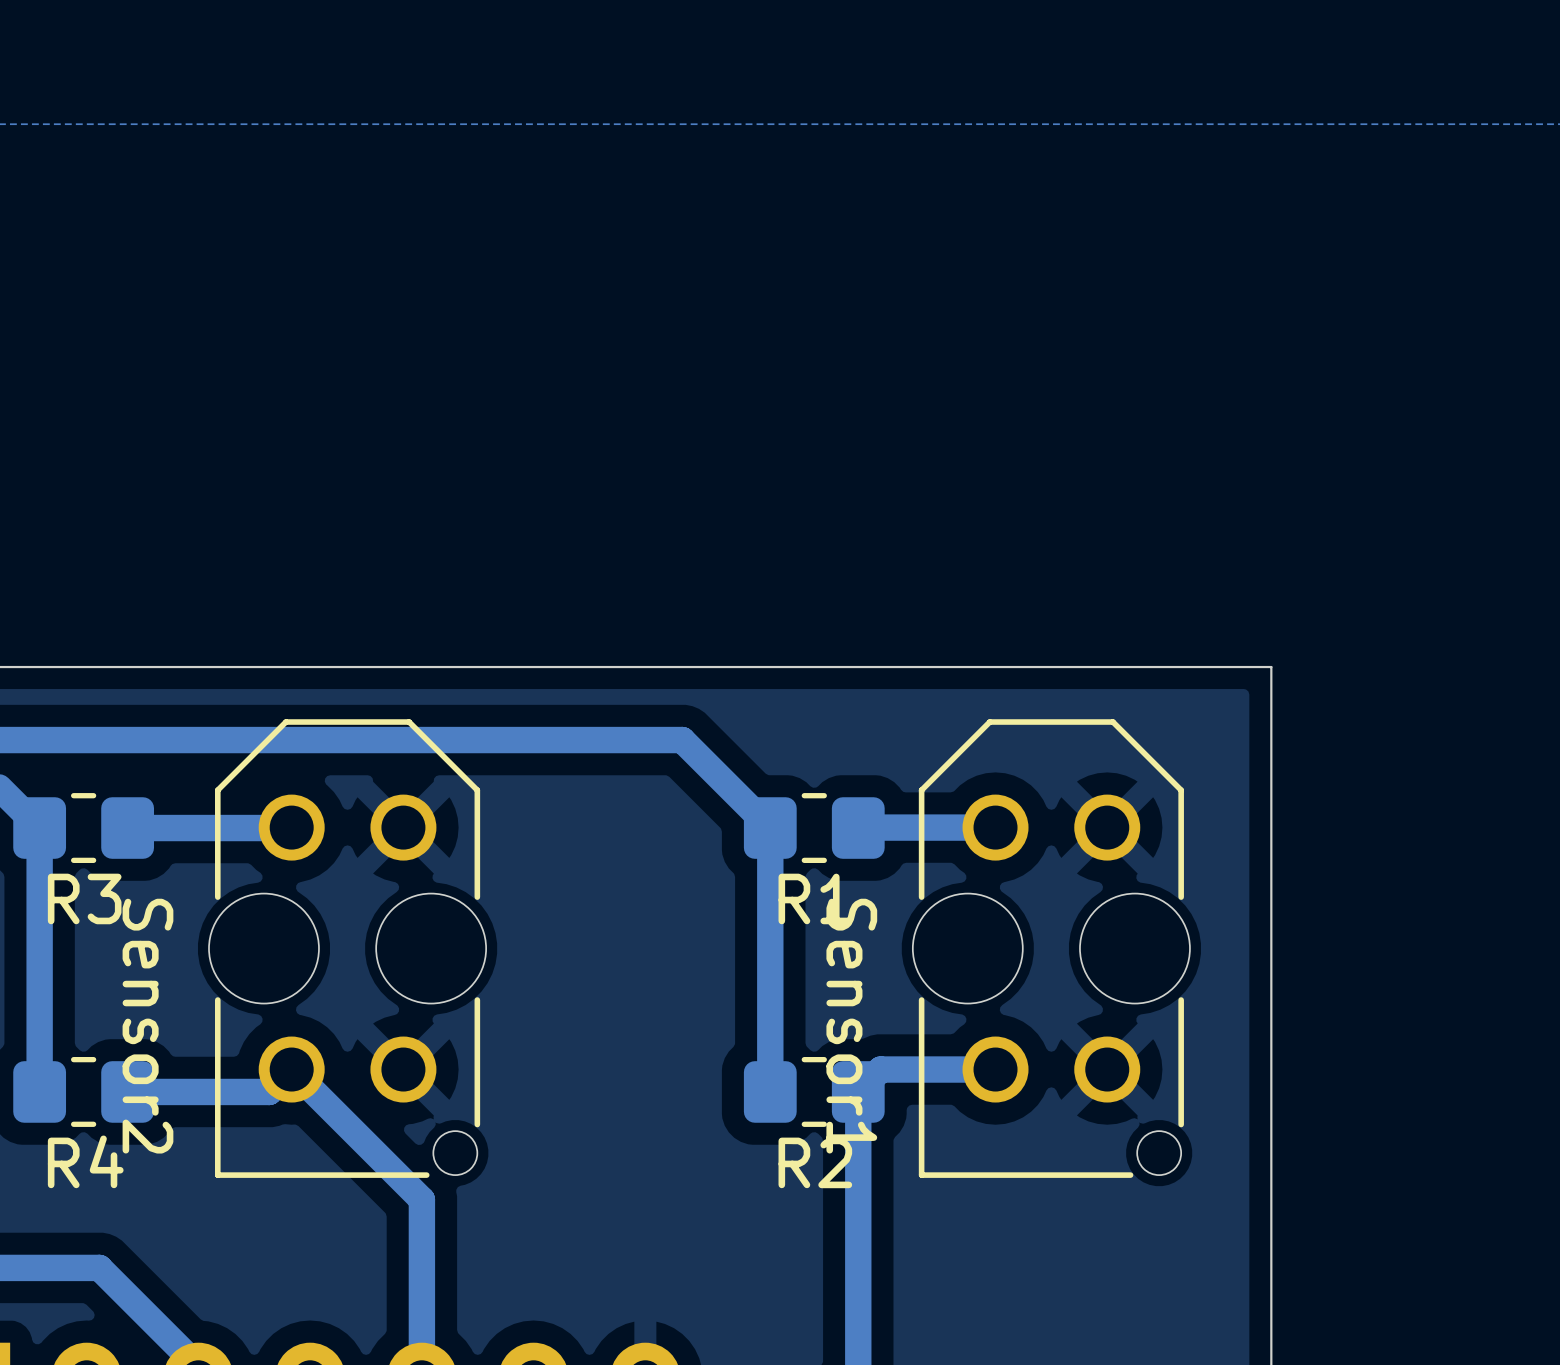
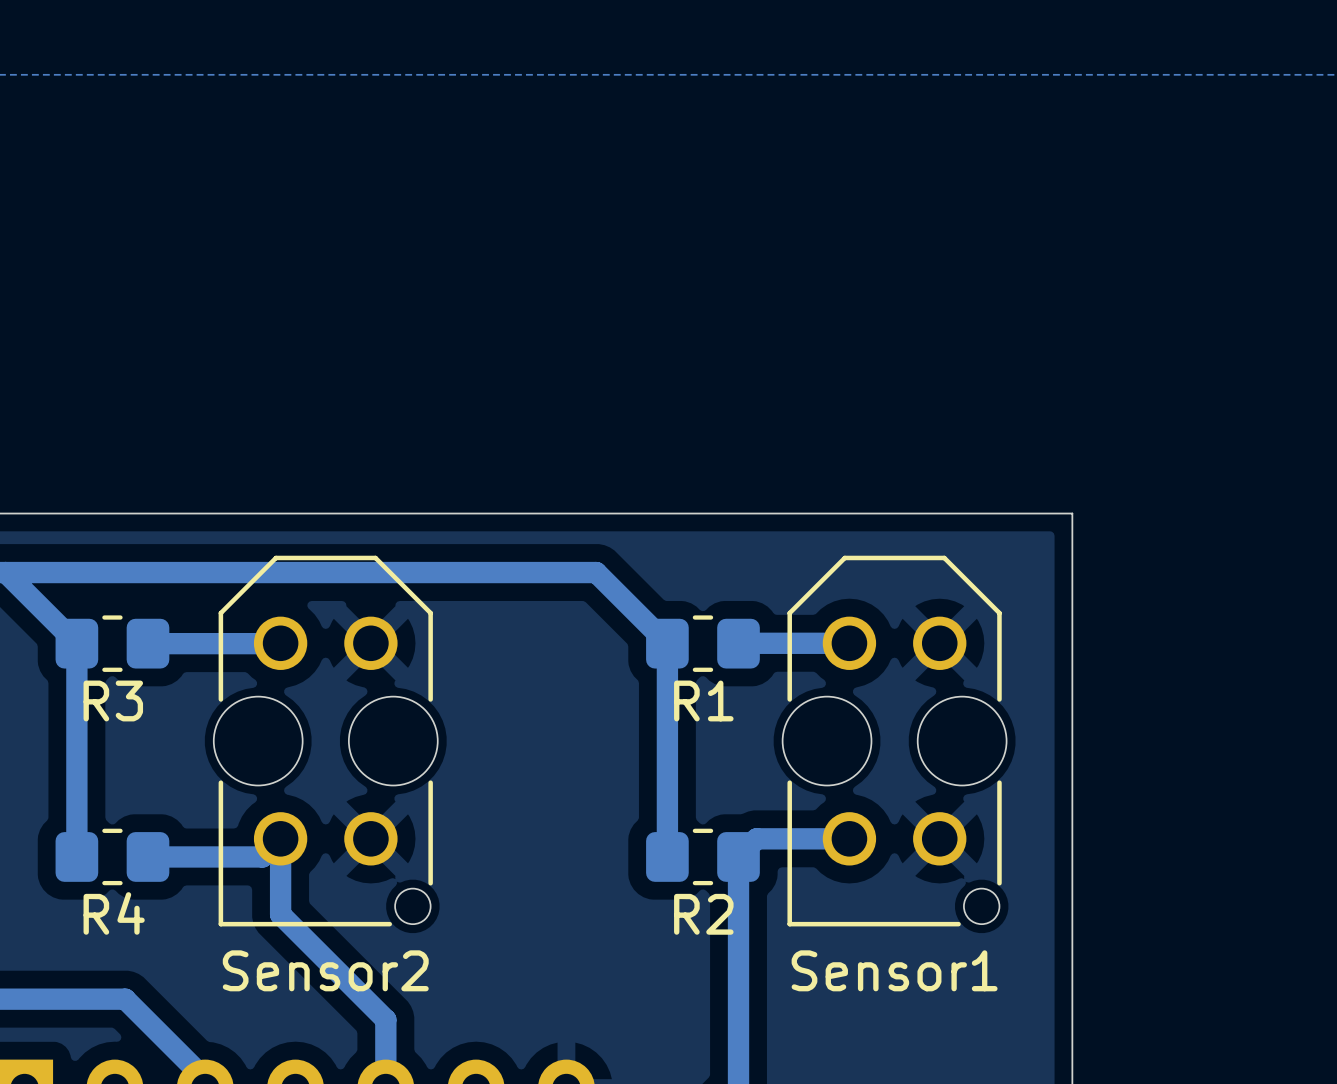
Sensor2 name rotation: 0° (147, 1026) -> 90° counterclockwise (325, 970)
Sensor1 name rotation: 0° (851, 1026) -> 90° counterclockwise (894, 970)
track: (291, 1069) (421, 1199) (421, 1293) -> (280, 838) (280, 914) (385, 1019)

